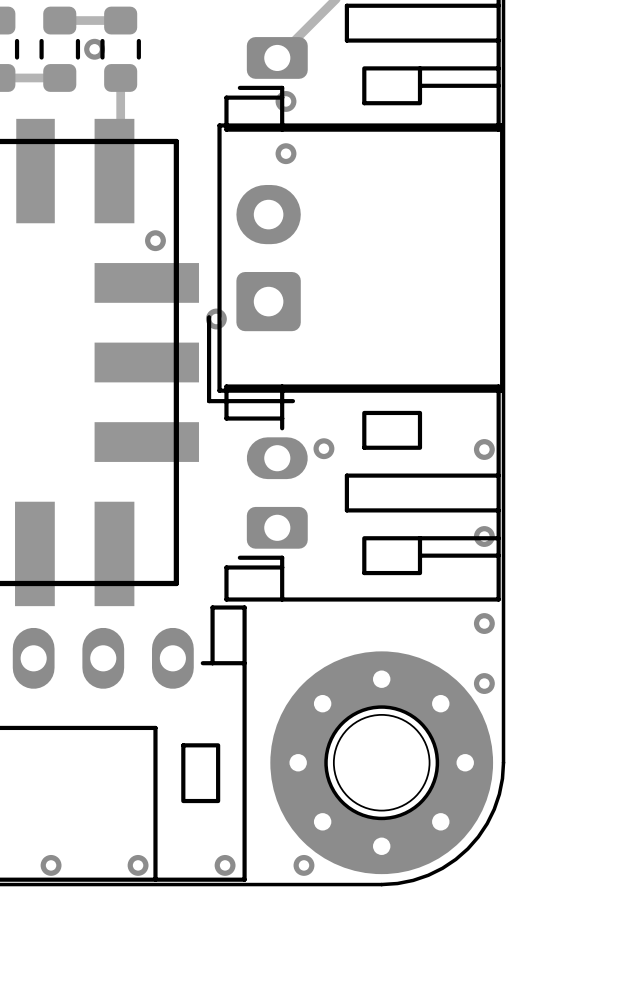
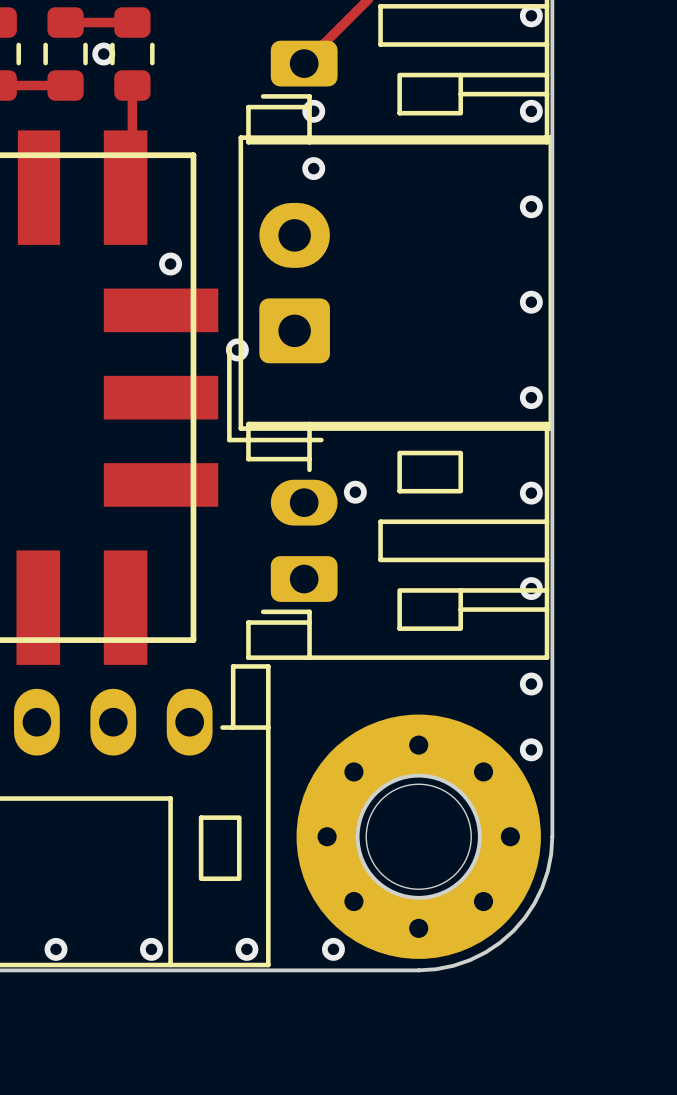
via: none -> (531, 15)
via: none -> (531, 111)
via: none -> (531, 206)
via: none -> (531, 302)
via: none -> (531, 397)

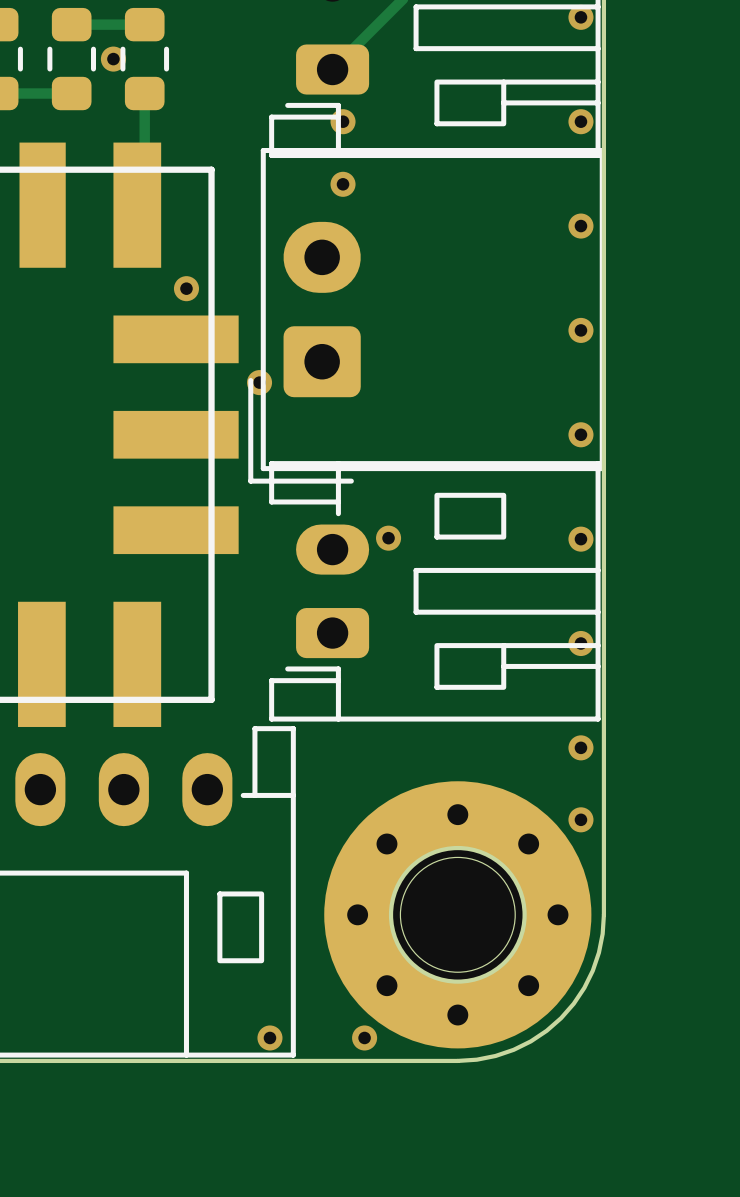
via: (56, 949) -> none
via: (151, 949) -> none

